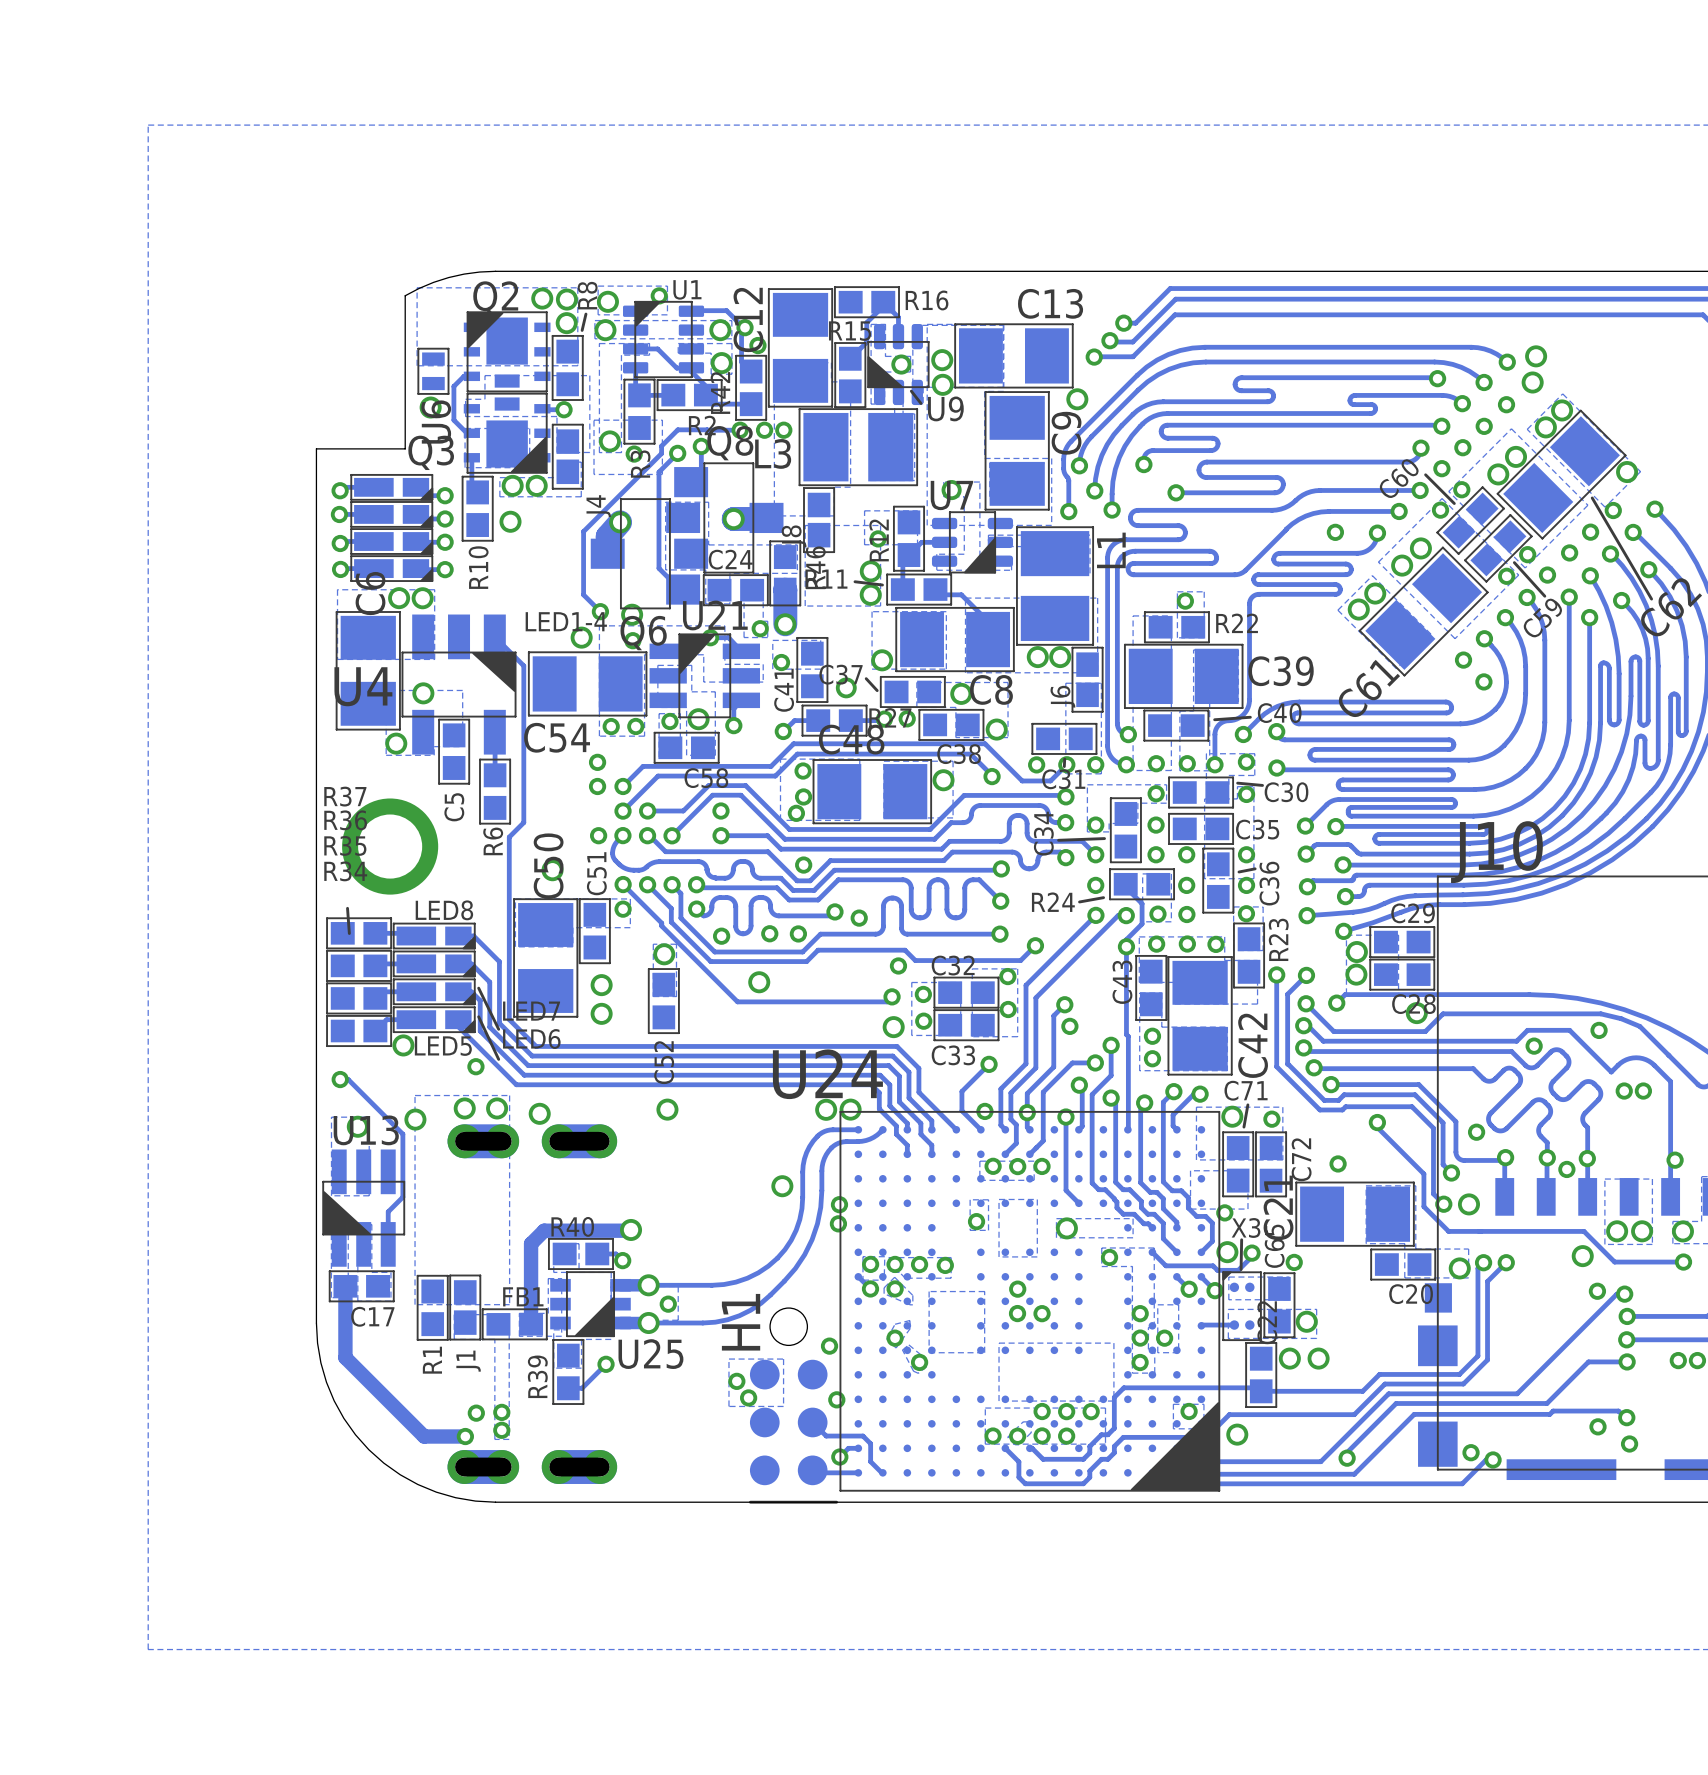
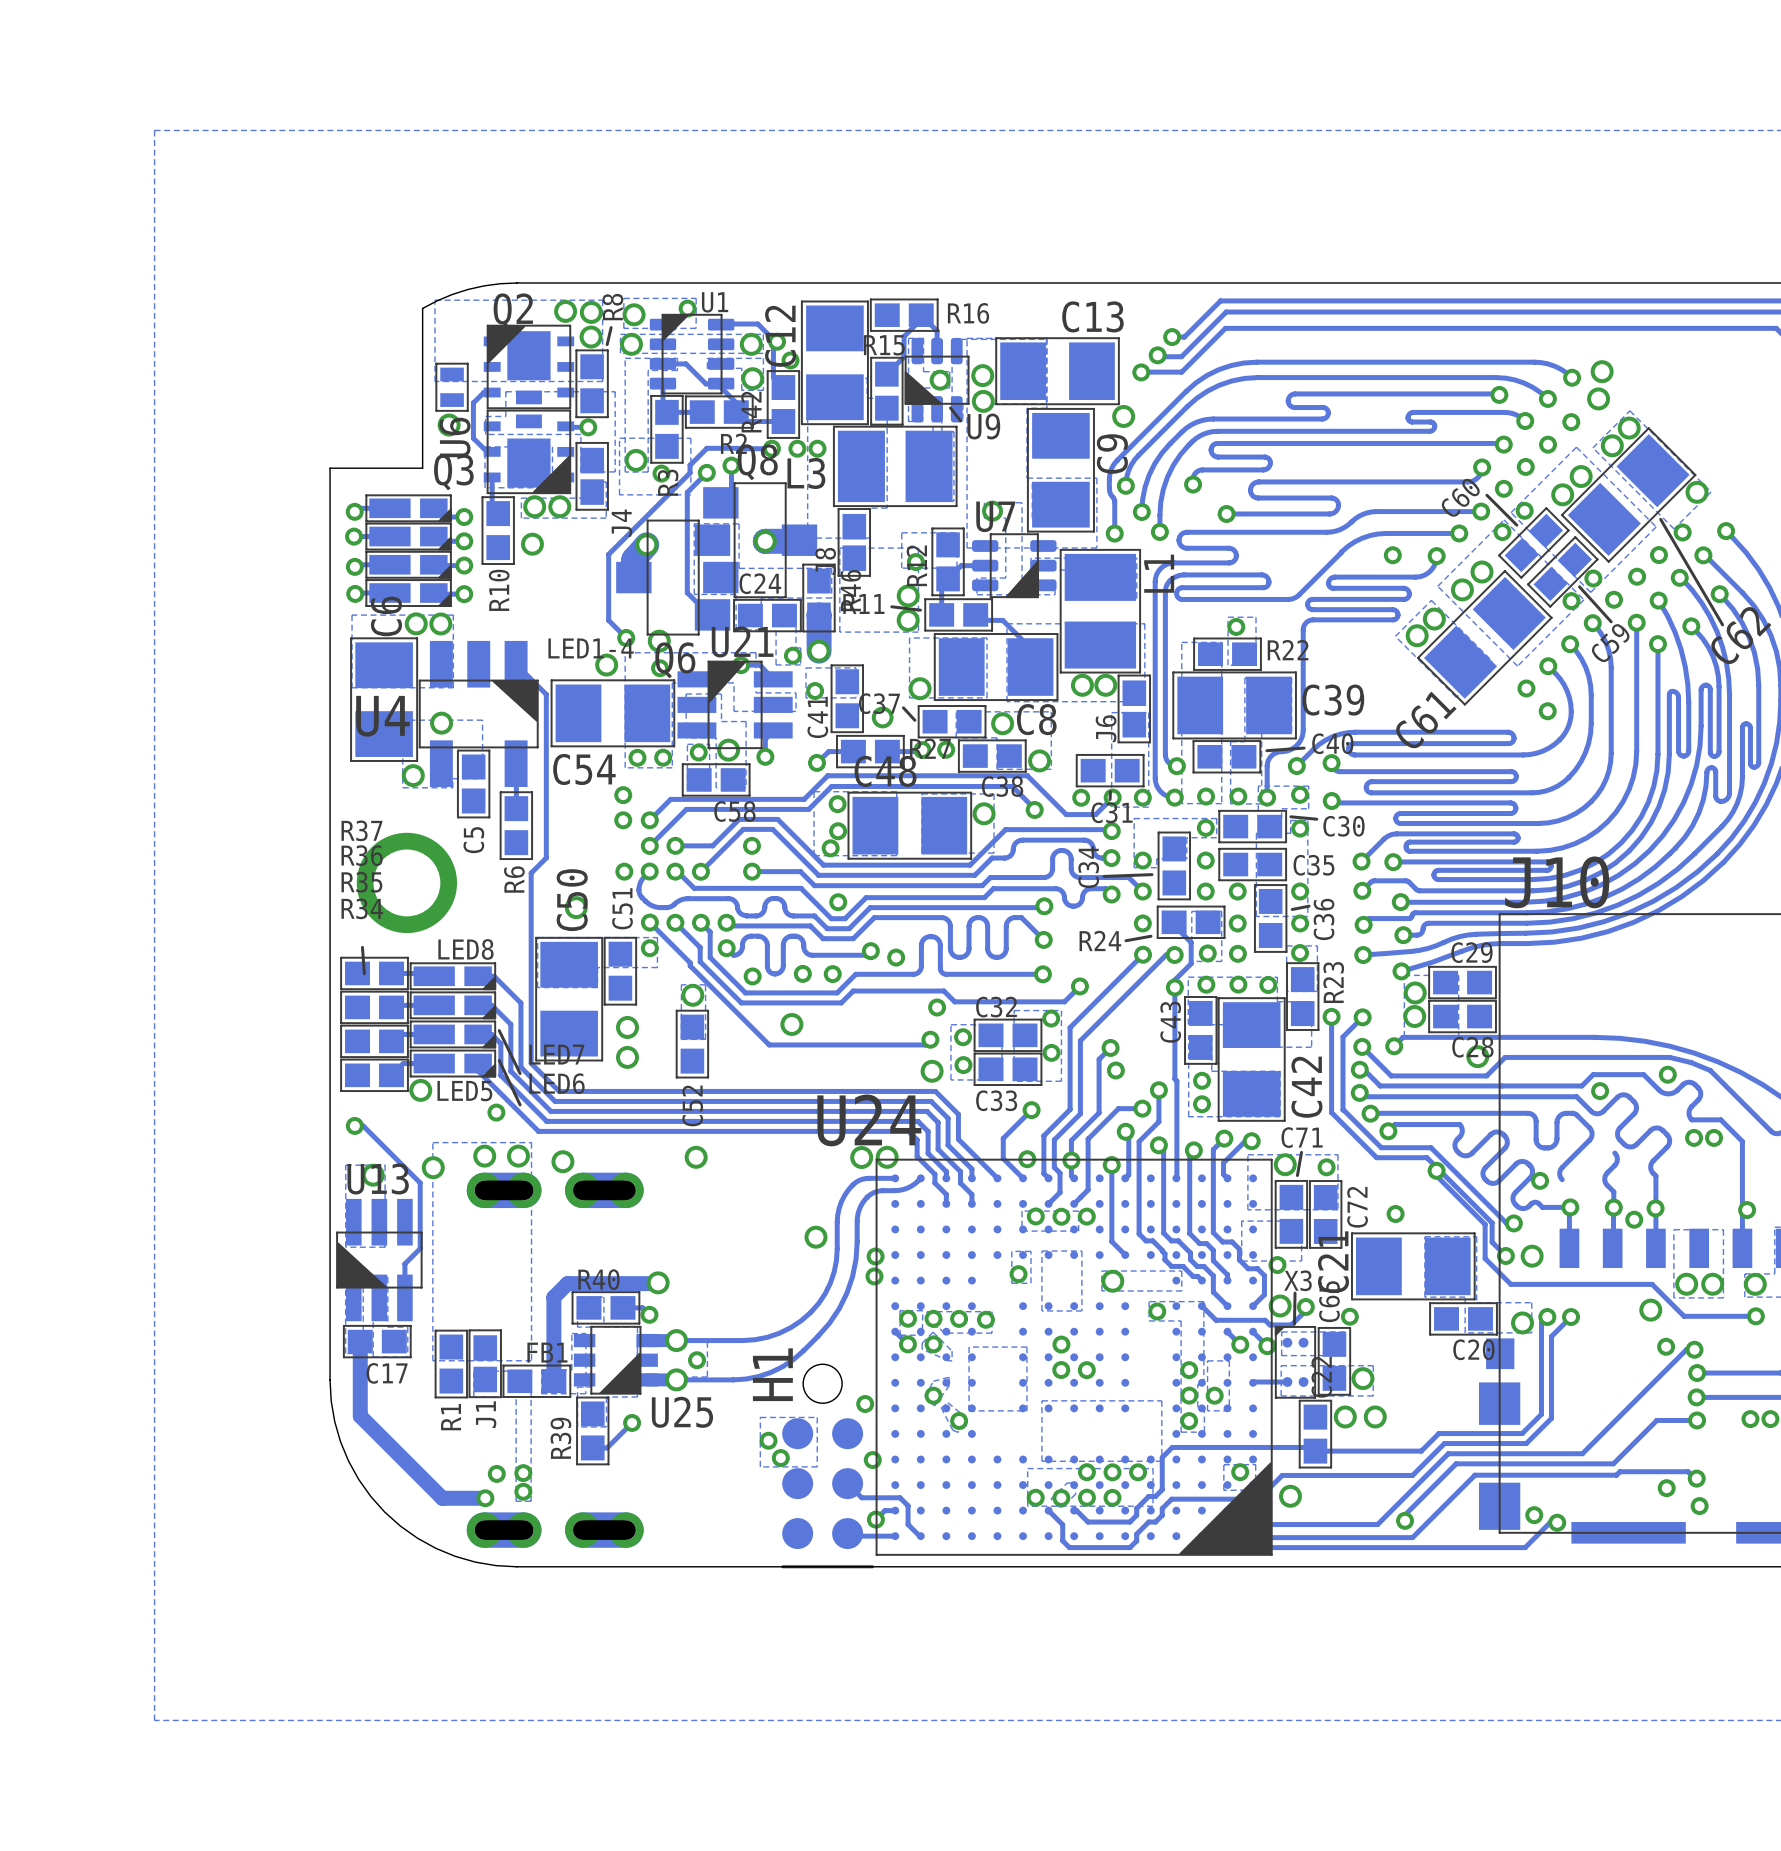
track: (1569, 1030) (1611, 1072) (1620, 1063) (1629, 1058) (1639, 1057) (1649, 1061) (1670, 1081) (1670, 1094) -> (1637, 1074) (1643, 1074) (1660, 1091) (1666, 1093) (1674, 1092) (1685, 1082) (1693, 1083) (1699, 1089) (1700, 1095) (1689, 1109) (1690, 1118) (1720, 1119) (1742, 1141)
track: (1314, 1067) (1473, 1068) (1484, 1079) (1489, 1081) (1494, 1079) (1505, 1069) (1512, 1068) (1519, 1075) (1520, 1083) (1488, 1116) (1490, 1124) (1499, 1130) (1505, 1129) (1534, 1100) (1542, 1100) (1548, 1105) -> (1370, 1113) (1530, 1113) (1535, 1119) (1536, 1142) (1544, 1147) (1551, 1147) (1556, 1142) (1557, 1121) (1559, 1116) (1565, 1113) (1574, 1113) (1590, 1128) (1592, 1135) (1589, 1140) (1561, 1168) (1559, 1174) (1562, 1179)
track: (1331, 1084) (1418, 1084) (1455, 1121) (1456, 1153) (1459, 1158) (1464, 1160) (1502, 1160) (1504, 1158) -> (1388, 1131) (1395, 1124) (1459, 1124) (1462, 1132) (1456, 1140) (1455, 1146) (1459, 1153) (1465, 1155) (1471, 1153) (1491, 1133) (1500, 1132) (1506, 1137) (1507, 1144) (1484, 1169) (1483, 1174) (1485, 1179) (1490, 1183) (1496, 1182) (1516, 1163) (1524, 1161) (1530, 1166) (1532, 1172) (1513, 1195) (1513, 1200) (1516, 1206) (1525, 1208) (1535, 1202) (1542, 1207) (1570, 1207)
track: (1338, 1100) (1344, 1094) (1415, 1094) (1443, 1122) (1443, 1164) (1451, 1173) -> (1396, 1147) (1431, 1147) (1506, 1223) (1513, 1223)
track: (1342, 1109) (1345, 1106) (1411, 1106) (1433, 1128) (1433, 1193) -> (1400, 1157) (1426, 1157) (1492, 1222) (1492, 1242) (1495, 1245)

